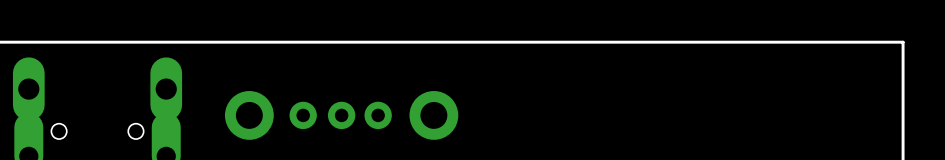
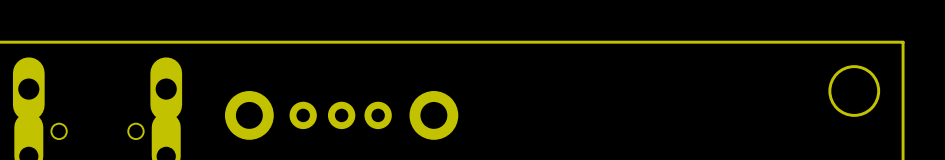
round board edge: none -> [828, 65, 881, 117]

